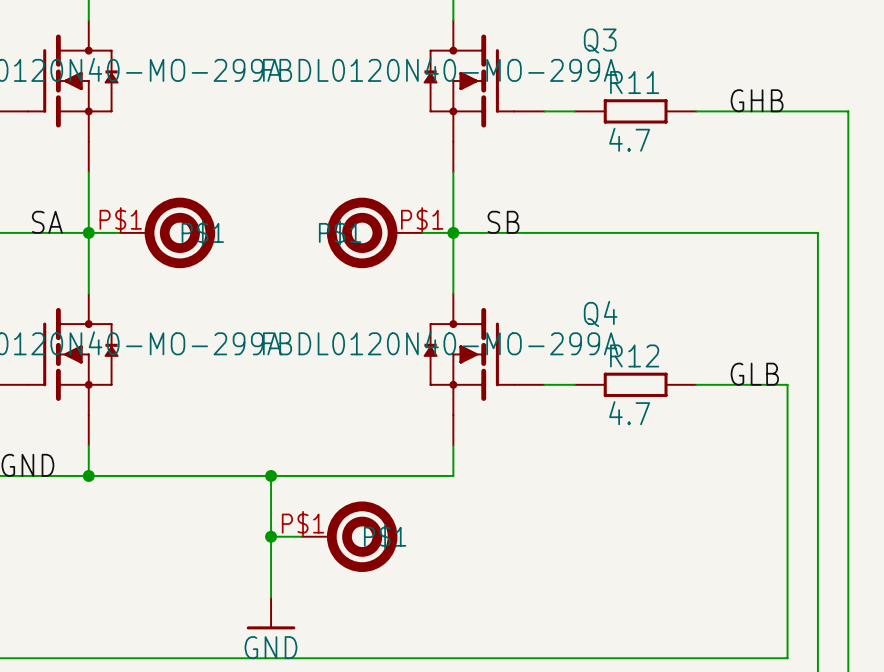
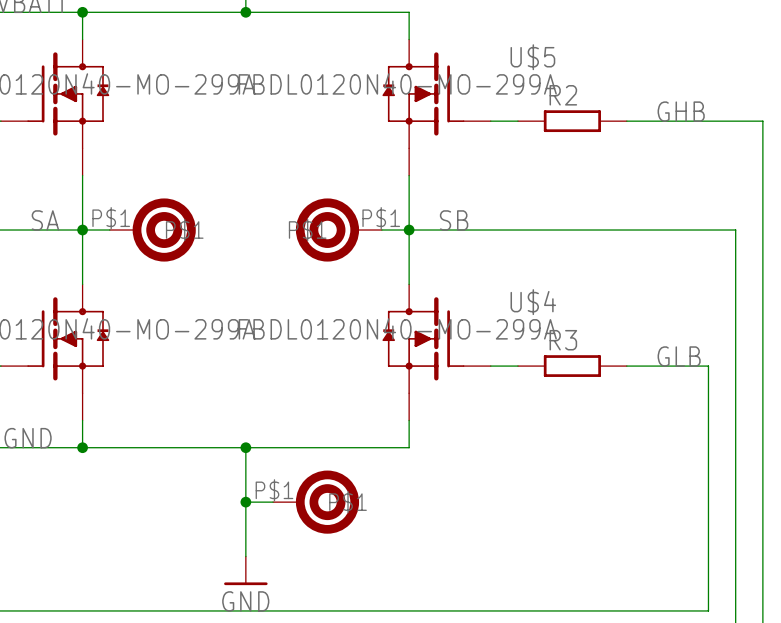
Q3 name: Q3 (600, 41) -> U$5 (532, 57)
R11 name: R11 (634, 82) -> R2 (563, 95)
R11 value: 4.7 (629, 139) -> none
Q4 name: Q4 (600, 313) -> U$4 (533, 302)
R12 name: R12 (634, 355) -> R3 (563, 340)
R12 value: 4.7 (629, 413) -> none

